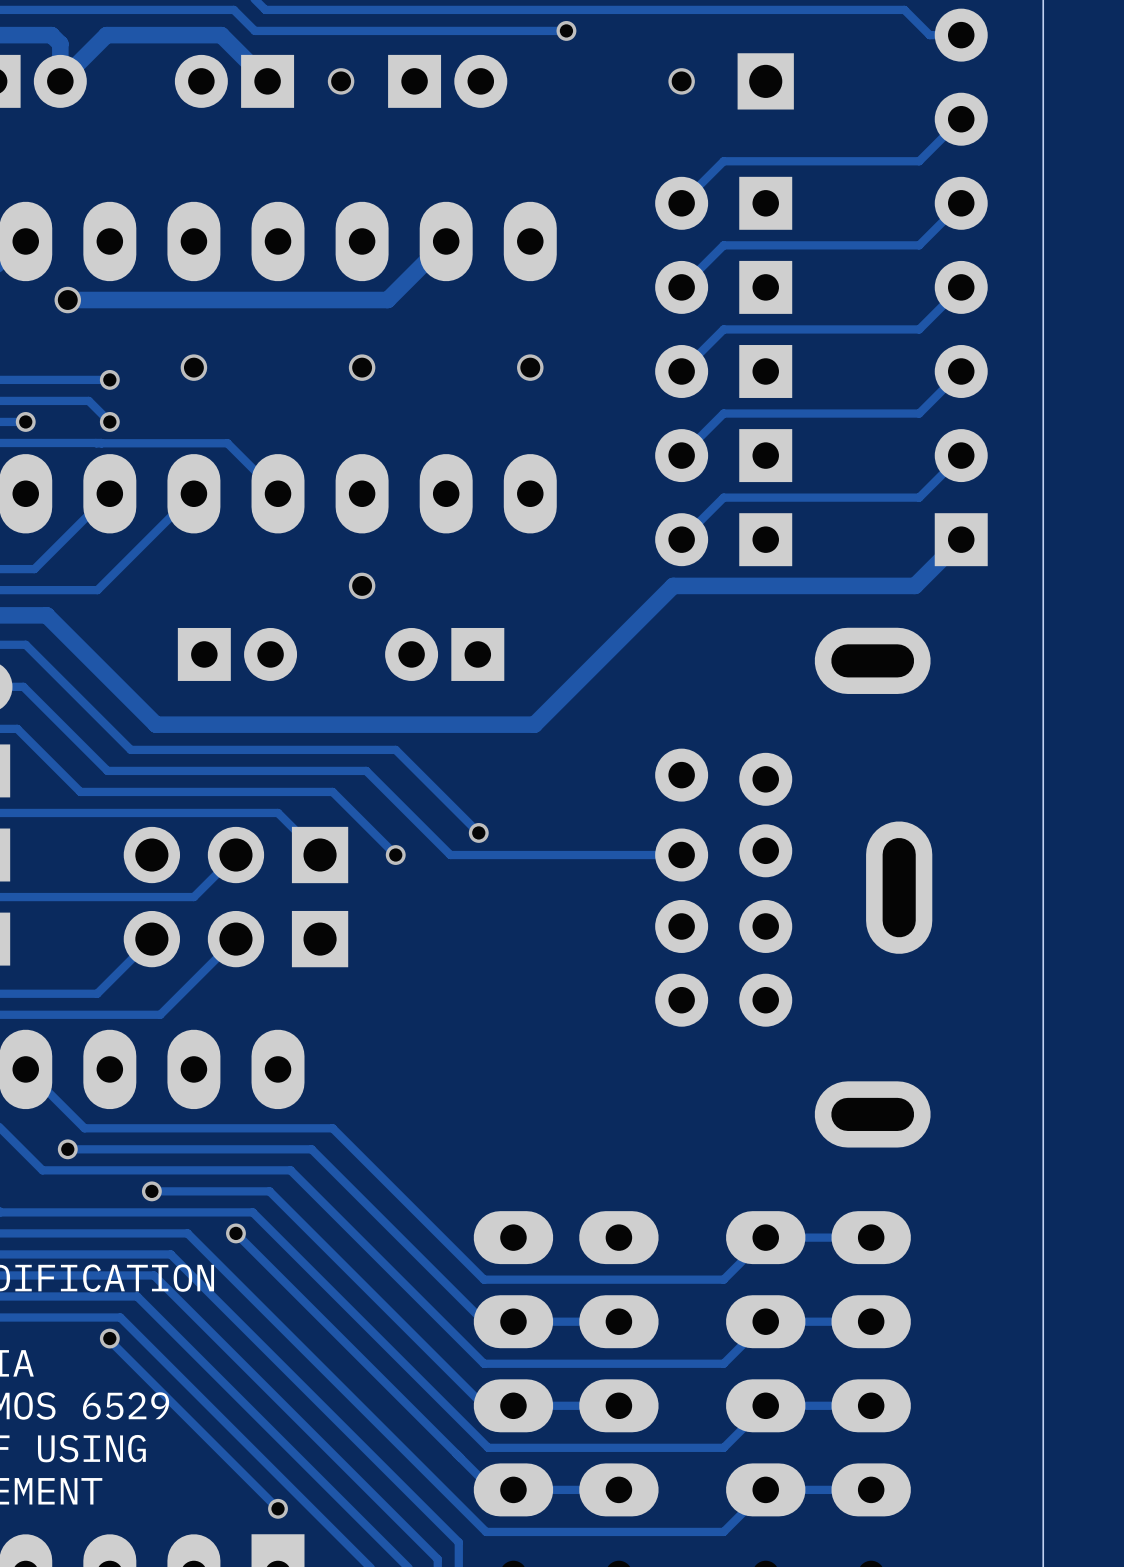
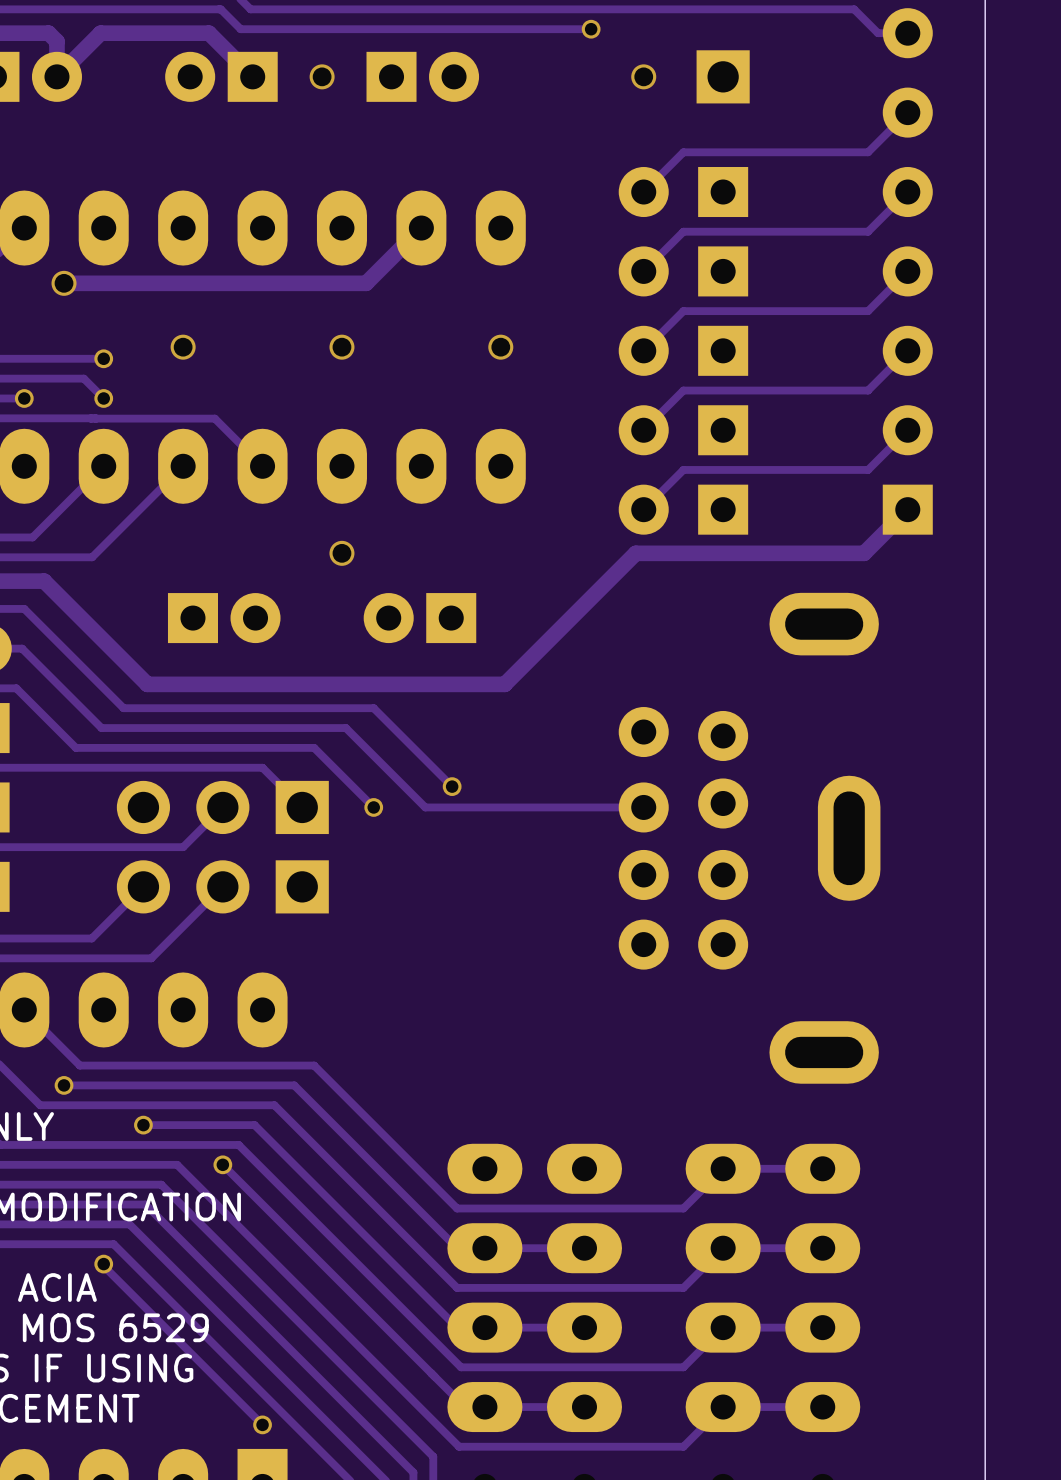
via position: (566, 30) -> (591, 29)
track: none -> (592, 29) (534, 29)

